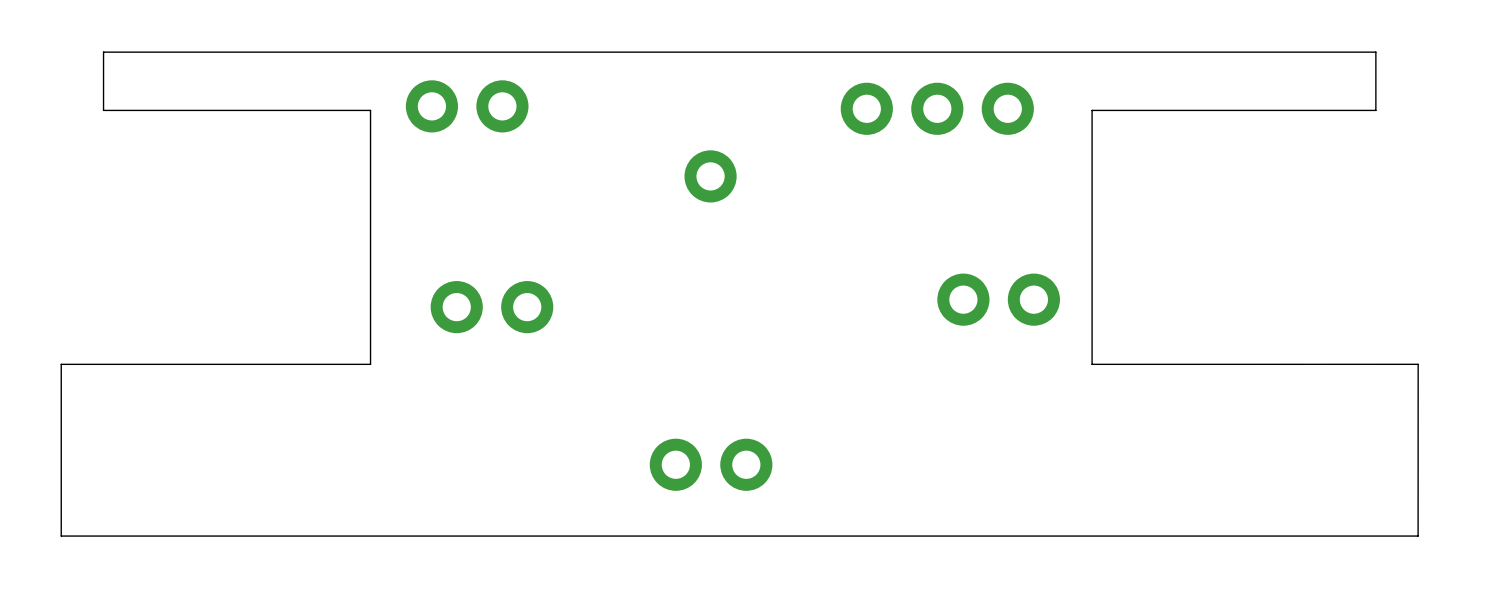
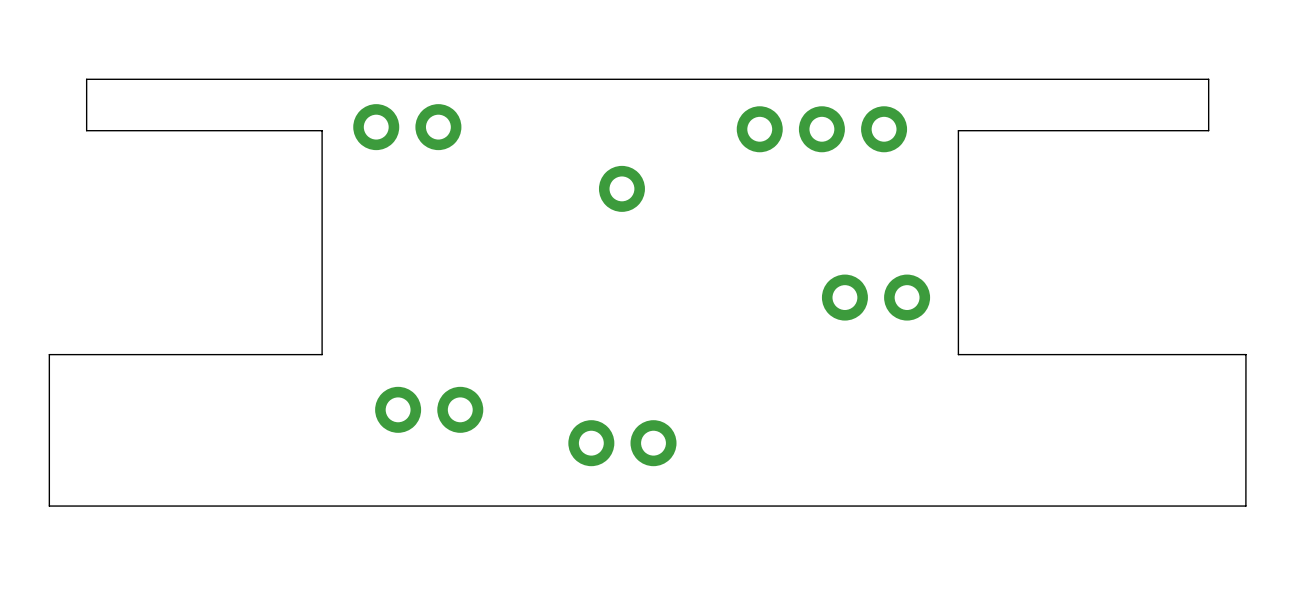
part position: (491, 307) -> (429, 409)

